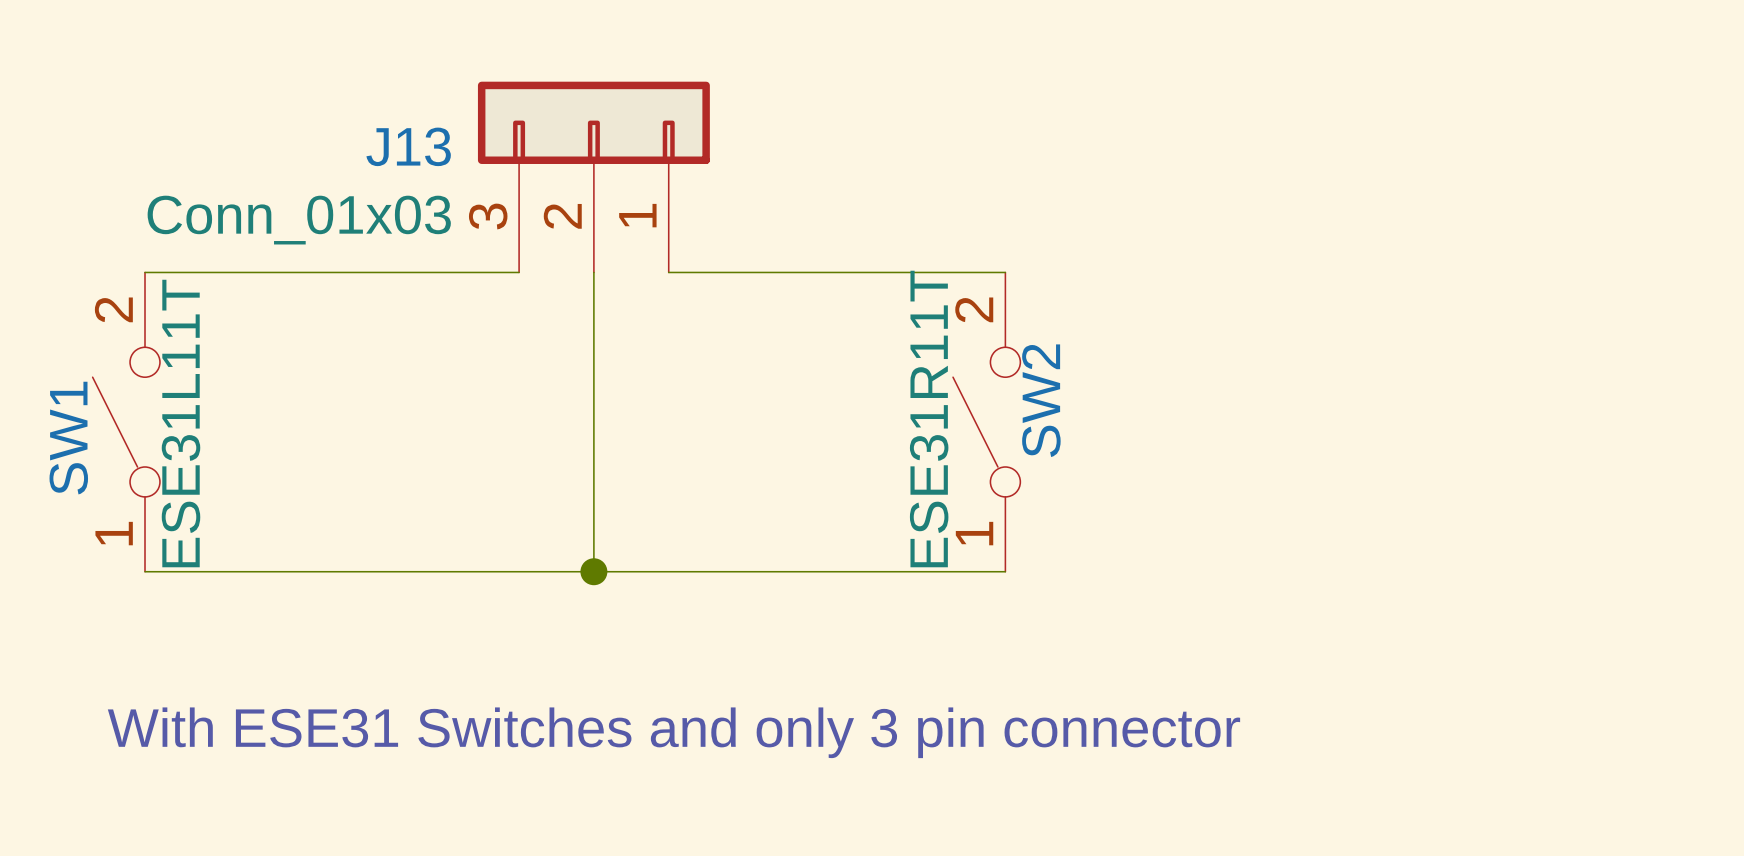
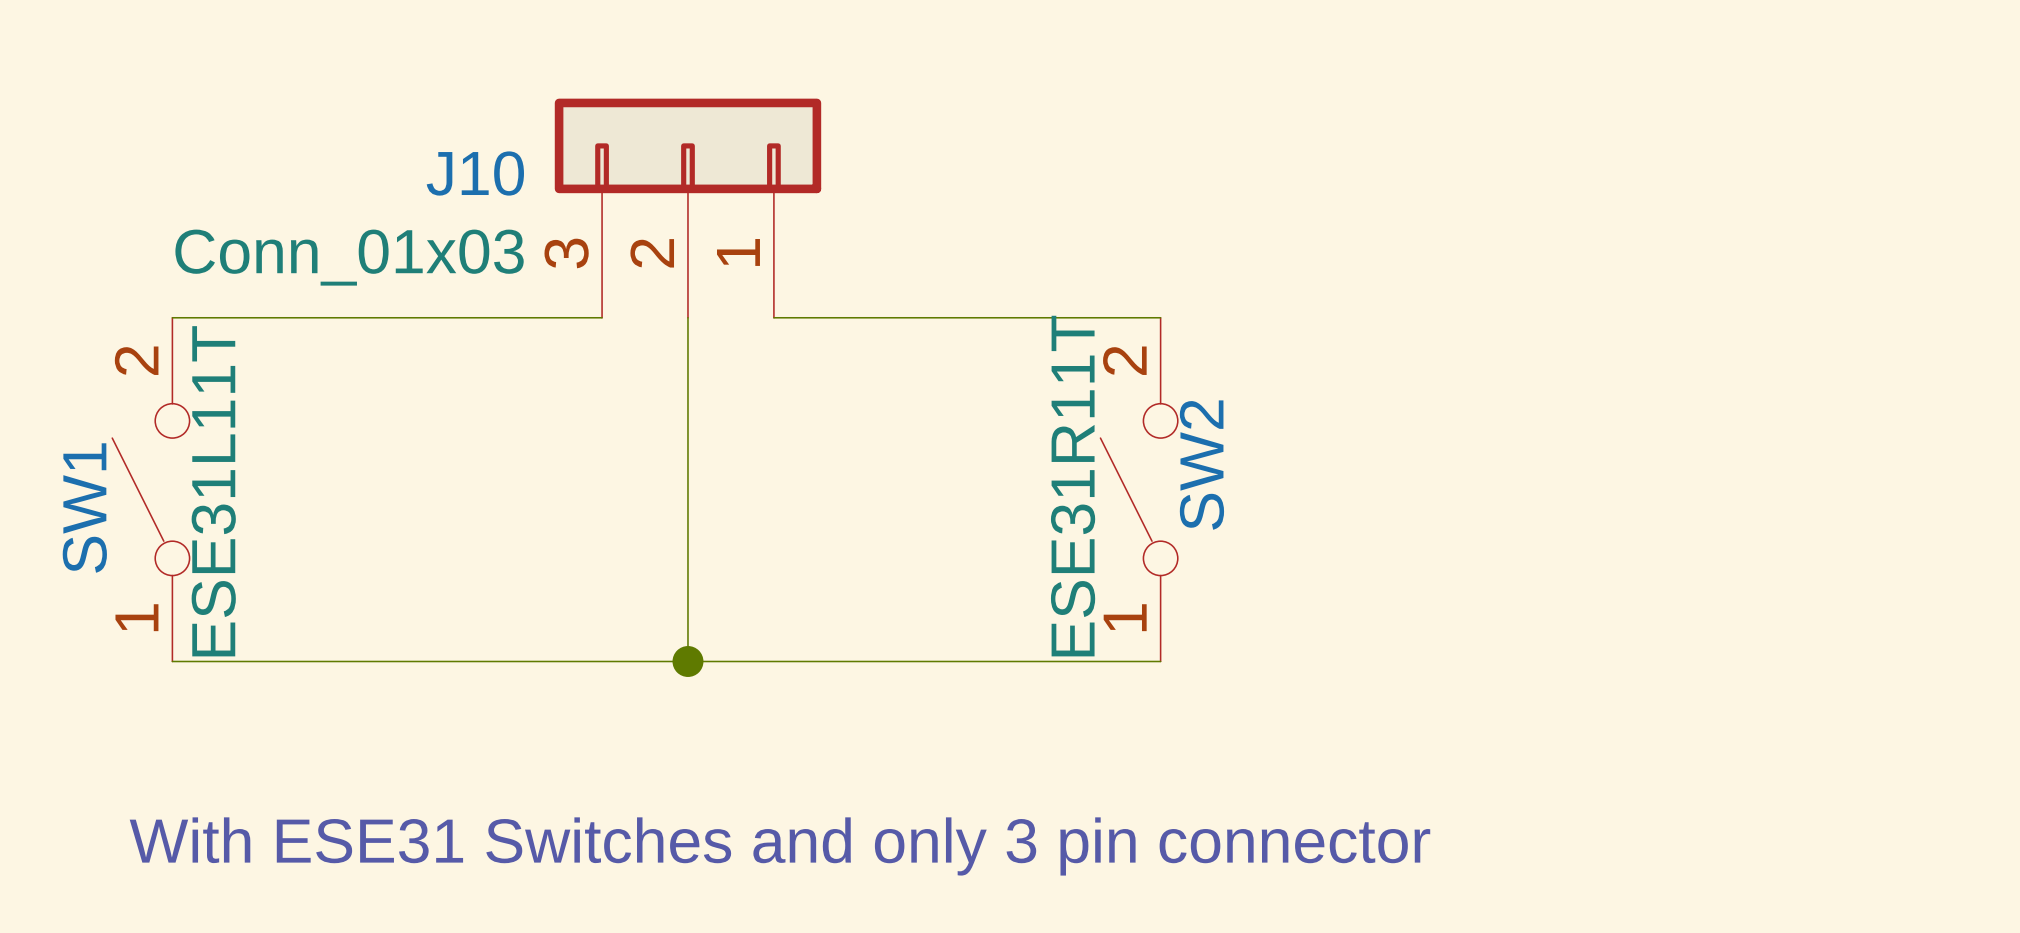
J13 name: J13 (408, 146) -> J10 (475, 173)

